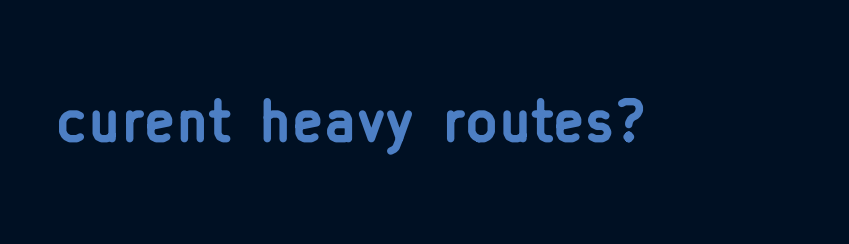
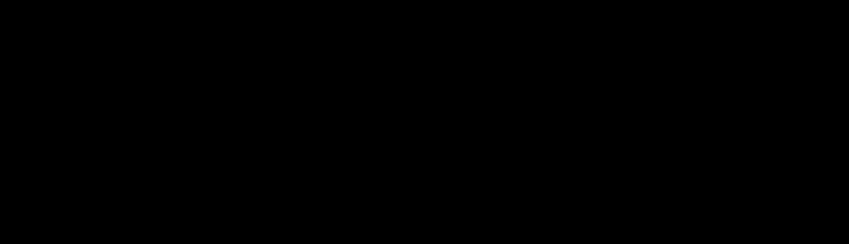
text: curent heavy routes? (351, 126) -> none

